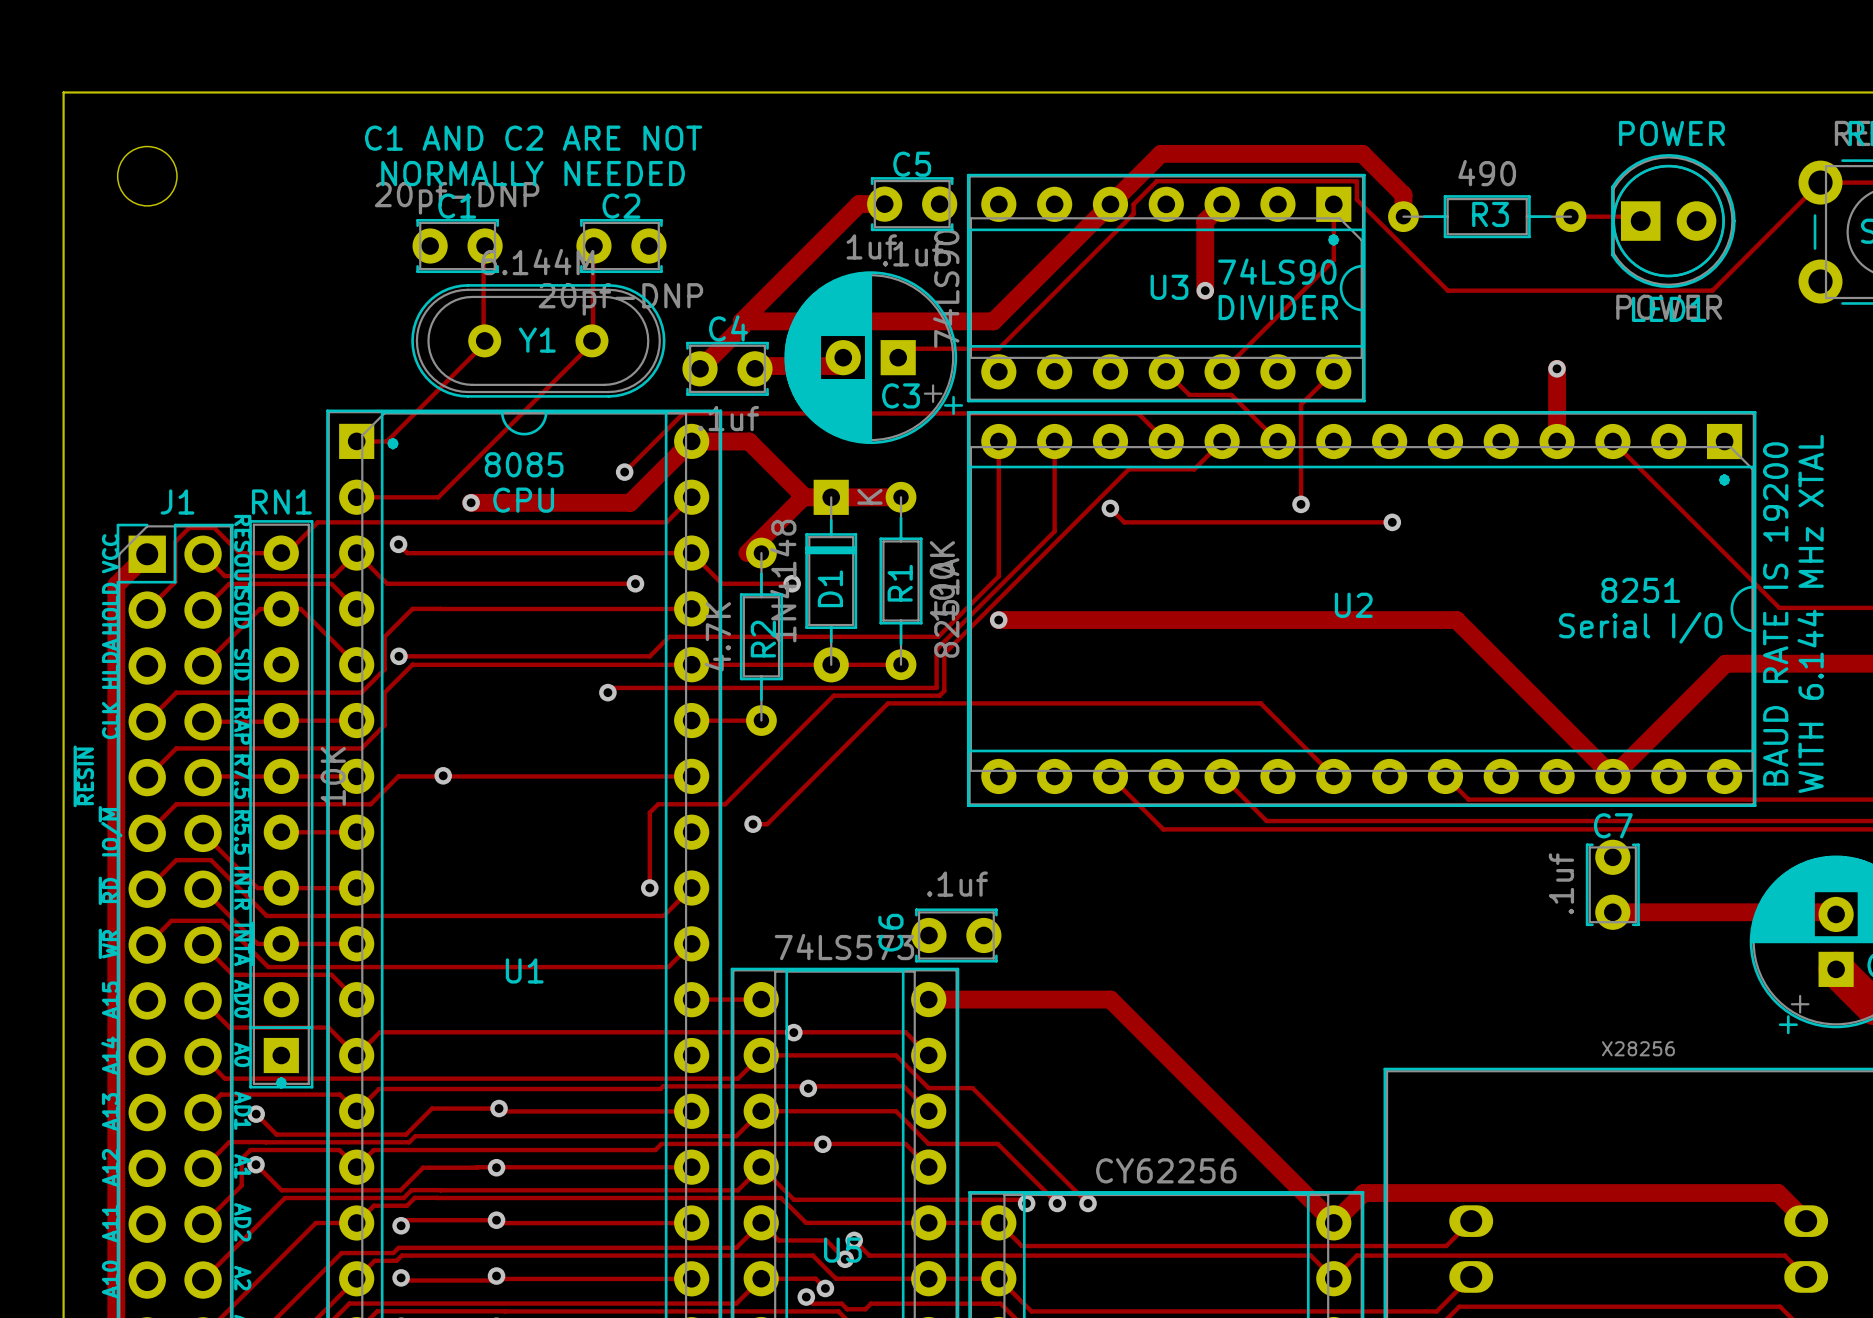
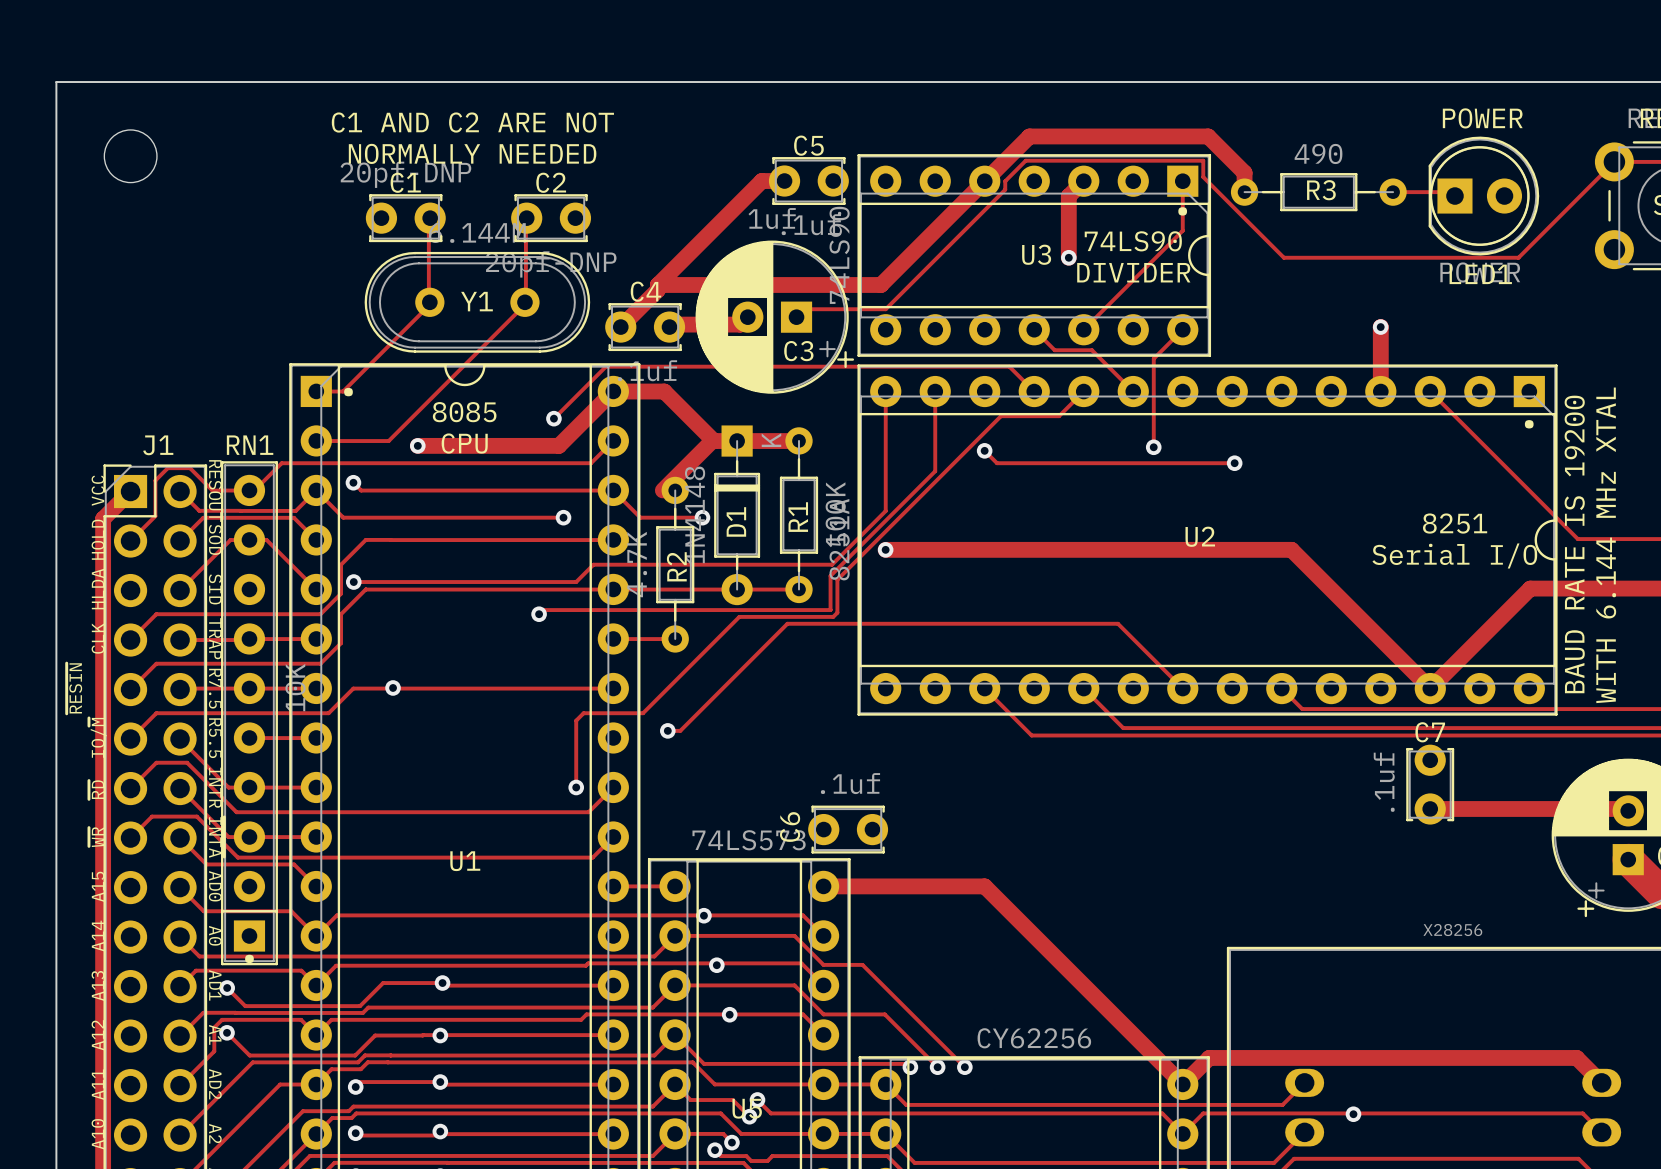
via: none -> (1353, 1114)

